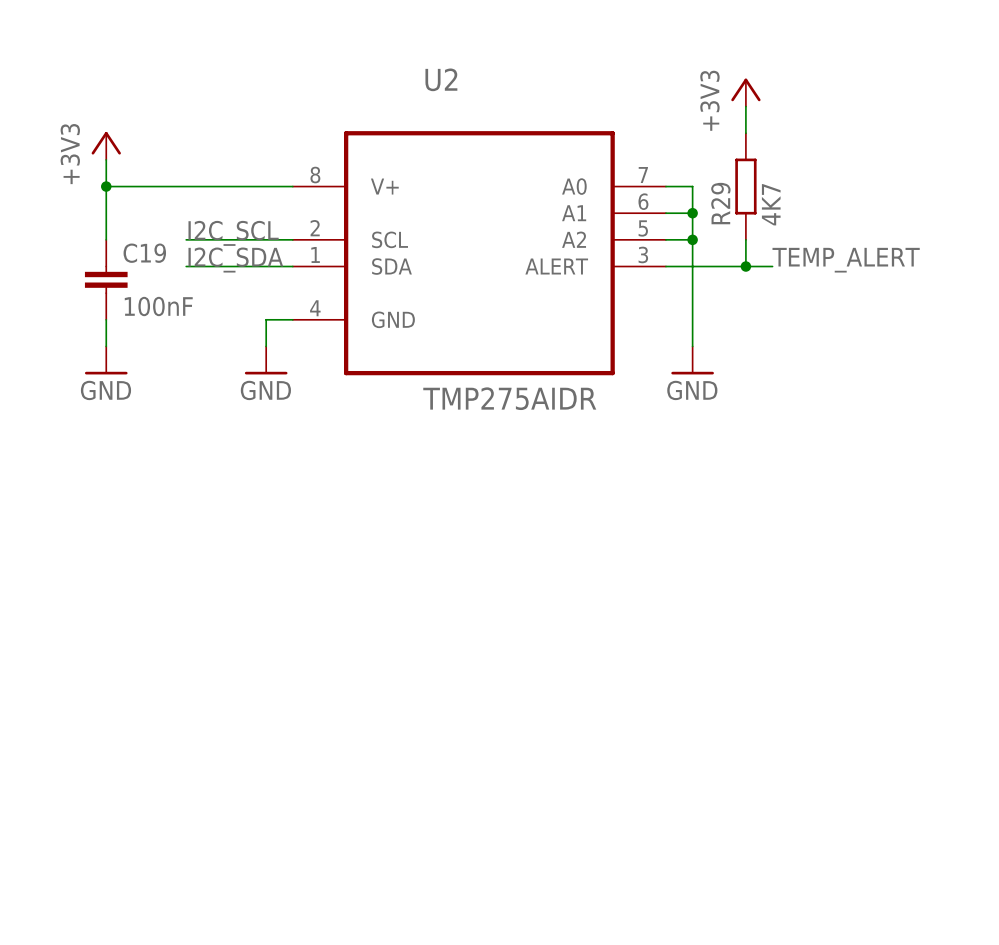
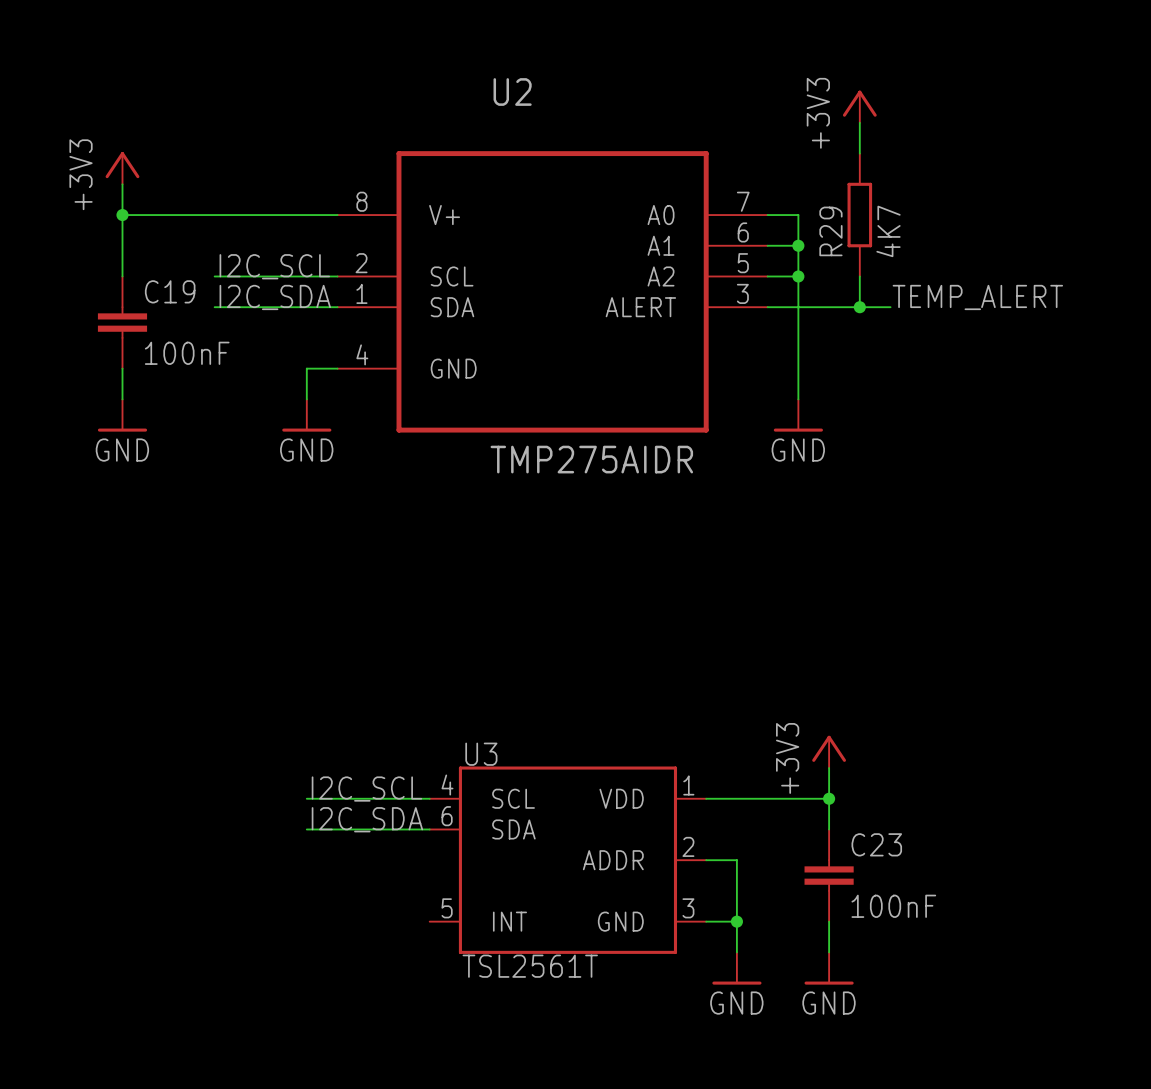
power symbol: none -> +3V3 (829, 751)
wire: none -> (829, 768) (829, 829)
label: none -> I2C_SCL (366, 789)
wire: none -> (306, 798) (429, 798)
wire: none -> (706, 798) (829, 798)
junction: none -> (829, 798)
label: none -> I2C_SDA (367, 819)
wire: none -> (306, 829) (429, 829)
U3: none -> TSL2561T (567, 860)
wire: none -> (706, 860) (736, 860) (736, 952)
C23: none -> 100nF (829, 875)
wire: none -> (706, 921) (736, 921)
junction: none -> (736, 921)
wire: none -> (829, 921) (829, 952)
power symbol: none -> GND (736, 968)
power symbol: none -> GND (829, 968)

